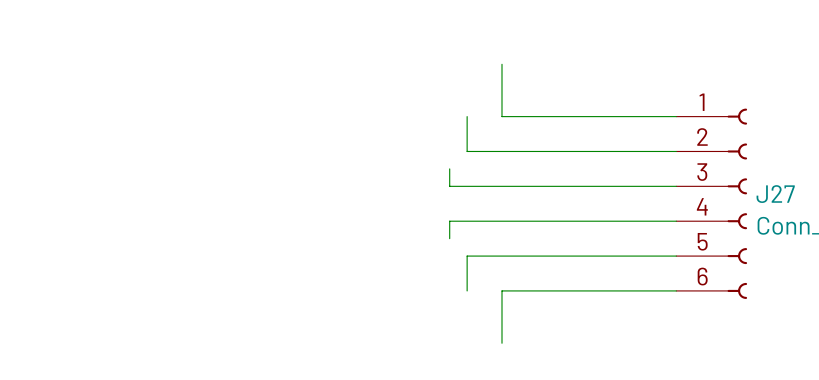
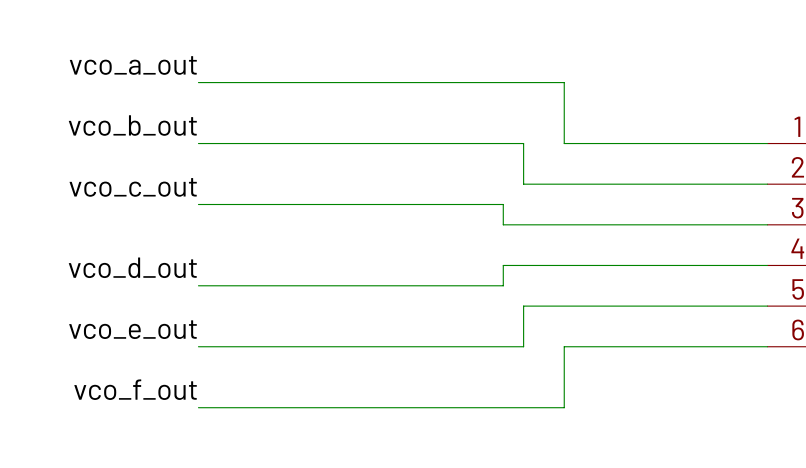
label: none -> vco_a_out (133, 65)
wire: none -> (198, 82) (564, 82)
label: none -> vco_b_out (132, 125)
wire: none -> (198, 143) (523, 143)
label: none -> vco_c_out (133, 187)
wire: none -> (198, 204) (503, 204)
label: none -> vco_d_out (132, 267)
wire: none -> (198, 285) (503, 285)
label: none -> vco_e_out (133, 329)
wire: none -> (198, 346) (523, 346)
label: none -> vco_f_out (135, 389)
wire: none -> (198, 407) (564, 407)

